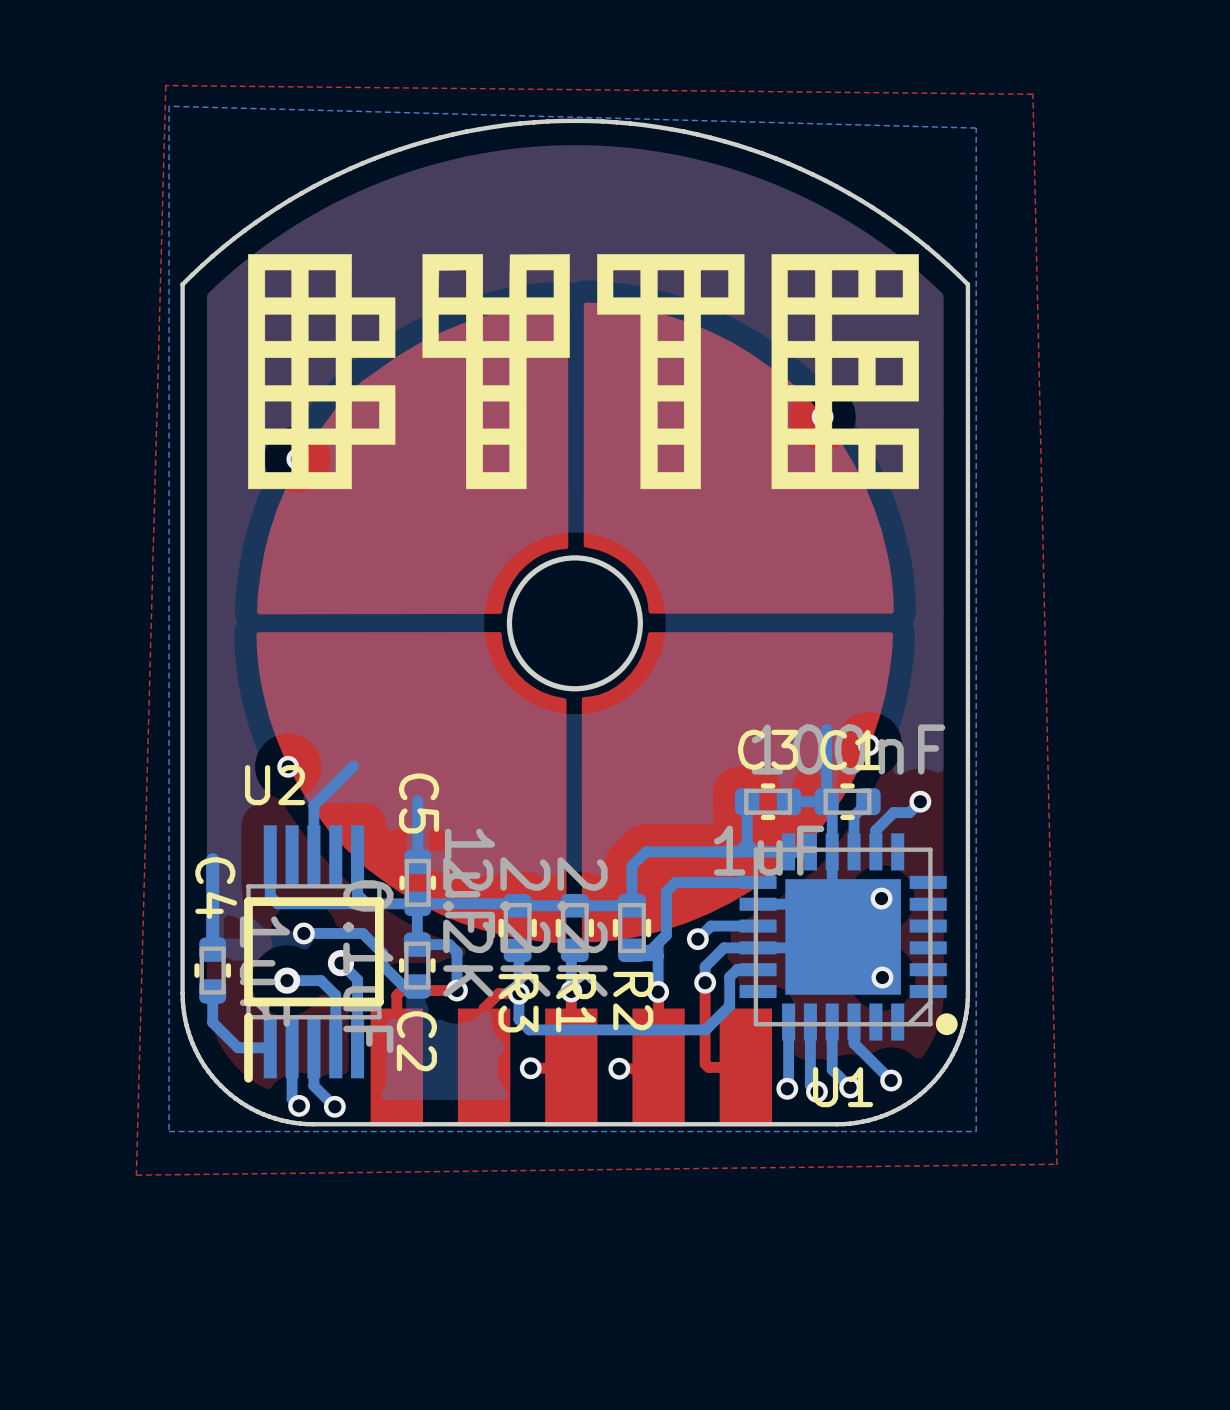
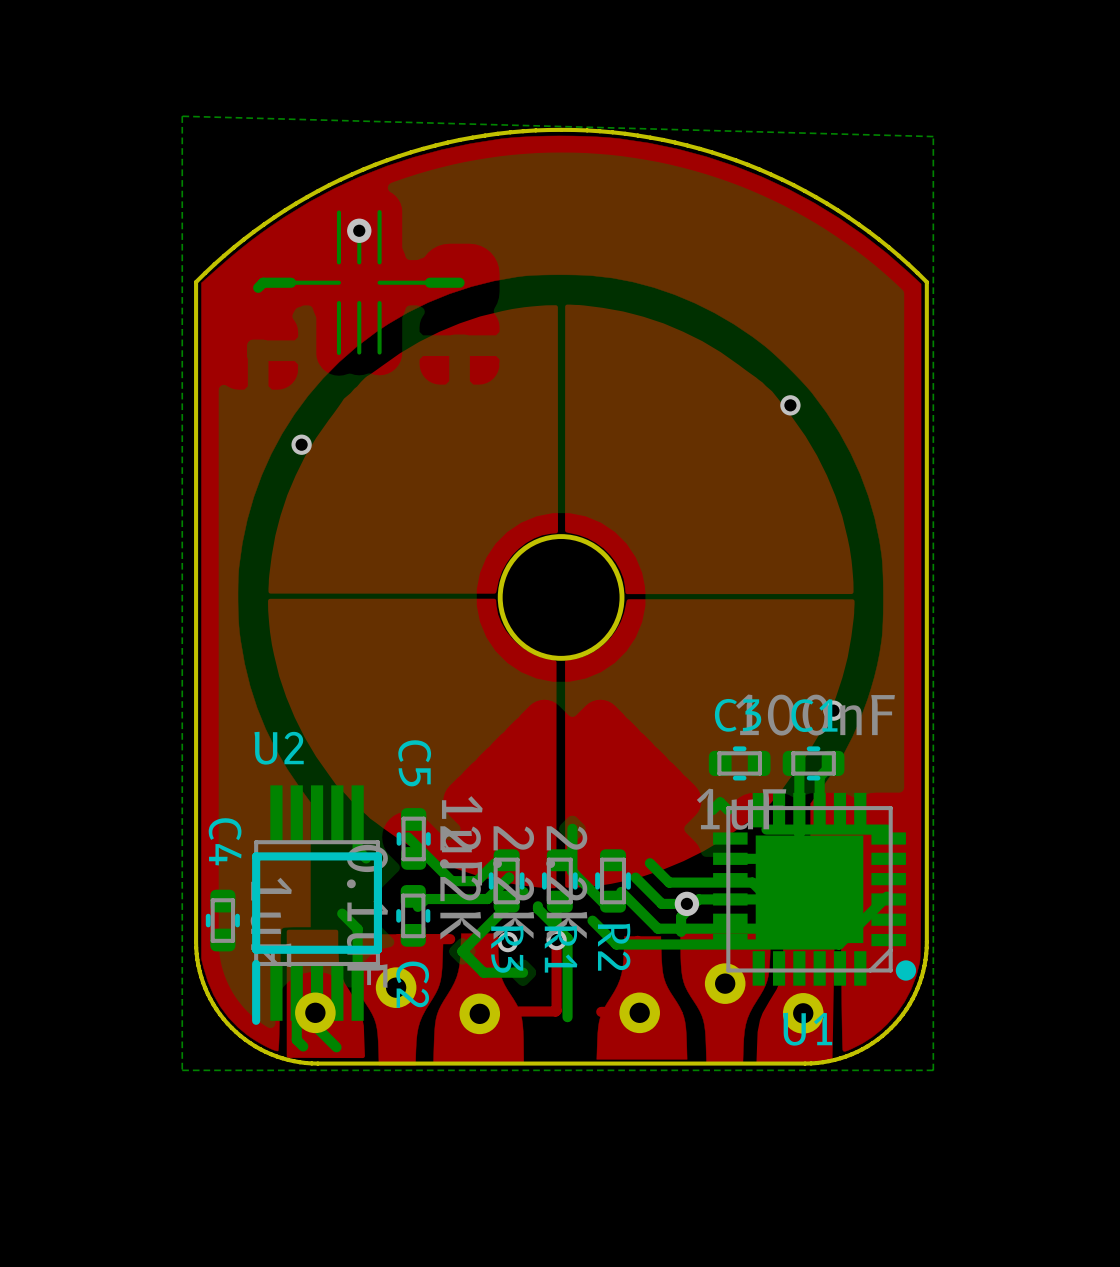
top zone outline: (165, 85) (1032, 94) (1058, 1164) (136, 1175) (165, 85) -> none
part footprint: [180, 118, 971, 1127] -> [194, 127, 929, 1066]
bottom track: none -> (338, 212) (338, 262)
bottom track: none -> (379, 212) (379, 262)
bottom track: none -> (359, 230) (359, 262)
via: none -> (359, 230)
drawing: [248, 254, 919, 490] -> none
bottom track: none -> (291, 282) (263, 282) (258, 287)
bottom track: none -> (338, 282) (289, 282)
bottom track: none -> (459, 282) (379, 282)
bottom track: none -> (338, 303) (338, 352)
bottom track: none -> (359, 303) (359, 352)
bottom track: none -> (379, 303) (379, 352)
bottom track: (826, 729) (826, 801) (789, 801) -> none
bottom track: (353, 765) (313, 805) (313, 855) -> none
via: (288, 766) -> none
bottom track: (417, 800) (417, 861) -> none
bottom track: (747, 801) (747, 843) -> none
bottom track: (920, 801) (909, 812) (893, 812) (875, 830) (875, 851) -> none
via: (920, 801) -> none
bottom track: (810, 851) (645, 851) (631, 865) (631, 905) (277, 903) (270, 896) (270, 855) -> none
bottom track: (212, 859) (212, 949) -> none
bottom track: none -> (572, 828) (572, 871) (606, 906)
bottom track: none -> (887, 829) (766, 829)
bottom track: none -> (407, 837) (451, 881) (476, 881) (494, 863)
bottom track: (758, 882) (675, 882) (666, 891) (666, 934) (650, 950) (631, 950) (637, 955) (658, 955) -> none
via: (881, 898) -> none
bottom track: (417, 904) (417, 944) (449, 944) (457, 952) (457, 990) -> none
bottom track: none -> (649, 863) (669, 882) (752, 882) (766, 896)
bottom track: none -> (508, 877) (487, 899) (425, 899) (417, 906)
bottom track: none -> (635, 877) (661, 903) (686, 903)
bottom track: (758, 926) (710, 926) (697, 939) -> none
bottom track: (303, 933) (362, 933) (382, 953) (382, 965) (403, 986) (417, 986) -> none
via: (303, 933) -> none
bottom track: none -> (523, 891) (462, 951) (483, 972) (523, 972)
bottom track: none -> (621, 891) (657, 928) (818, 928) (826, 920) (826, 896)
via position: (697, 939) -> (686, 903)
bottom track: (658, 943) (658, 991) -> none
bottom track: none -> (887, 896) (839, 944) (616, 944) (592, 920)
bottom track: (517, 950) (518, 1019) (529, 1029) (705, 1029) (729, 1005) (729, 977) (737, 969) (758, 969) -> none
bottom track: none -> (537, 906) (537, 908) (567, 938) (567, 1017)
via: (340, 963) -> none
via: (882, 977) -> none
bottom track: (287, 980) (320, 980) (335, 995) (335, 1047) -> none
via: (287, 980) -> none
top track: (705, 982) (705, 1063) (708, 1067) (745, 1067) -> none
via: (705, 982) -> none
via: (457, 990) -> none
bottom track: (212, 991) (212, 1022) (238, 1047) (270, 1047) -> none
via: (658, 991) -> none
bottom track: (788, 1022) (787, 1088) -> none
bottom track: (810, 1022) (810, 1085) (816, 1091) -> none
bottom track: (832, 1022) (832, 1069) (850, 1087) -> none
bottom track: (854, 1022) (854, 1043) (891, 1080) -> none
part: (571, 1067) -> none
via: (530, 1068) -> none
via: (619, 1068) -> none
via: (891, 1080) -> none
via: (850, 1087) -> none
via: (787, 1088) -> none
via: (816, 1091) -> none
via: (299, 1105) -> none
via: (334, 1106) -> none

